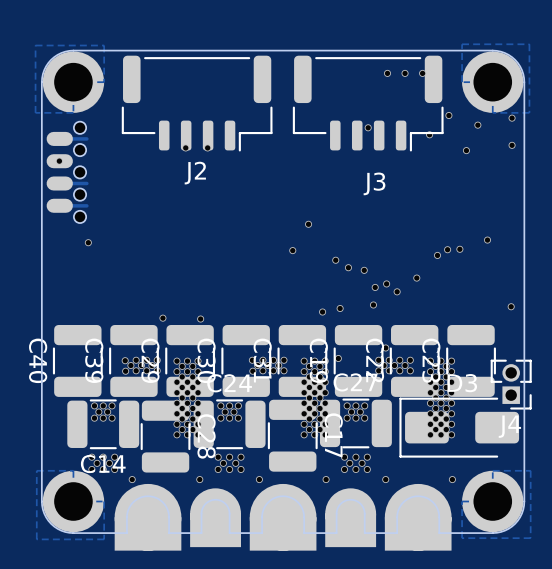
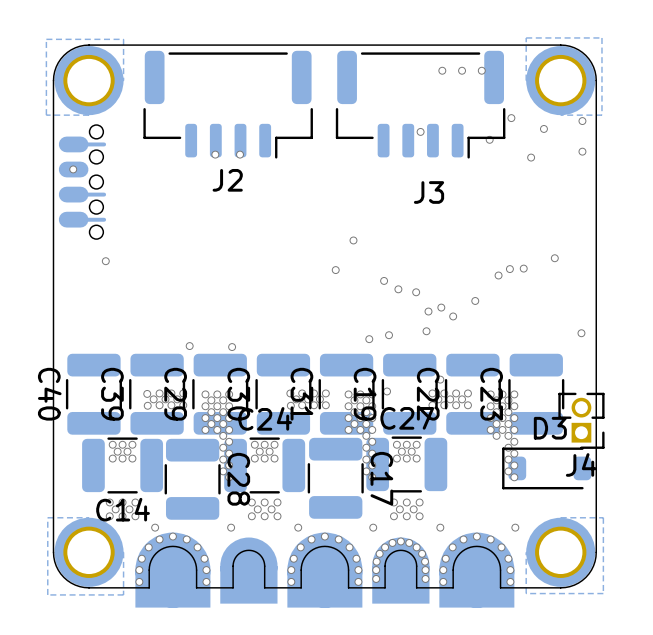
via: (182, 397) -> none
via: (309, 397) -> none
D3 footprint: [399, 397, 520, 458] -> [502, 447, 592, 490]
via: (176, 403) -> none
via: (187, 403) -> none
via: (304, 403) -> none
via: (314, 403) -> none
via: (430, 403) -> none
via: (441, 403) -> none
via: (182, 408) -> none
via: (309, 408) -> none
via: (435, 408) -> none
via: (176, 413) -> none
via: (187, 413) -> none
via: (304, 413) -> none
via: (314, 413) -> none
via: (430, 413) -> none
via: (441, 413) -> none
via: (182, 419) -> none
via: (309, 419) -> none
via: (435, 419) -> none
via: (176, 424) -> none
via: (187, 424) -> none
via: (304, 424) -> none
via: (314, 424) -> none
via: (430, 424) -> none
via: (441, 424) -> none
via: (182, 429) -> none
via: (309, 429) -> none
via: (435, 429) -> none
via: (176, 434) -> none
via: (187, 434) -> none
via: (304, 434) -> none
via: (314, 434) -> none
via: (430, 434) -> none
via: (441, 434) -> none
via: none -> (172, 536)
via: none -> (324, 536)
via: none -> (476, 536)
via: none -> (159, 539)
via: none -> (186, 539)
via: none -> (311, 539)
via: none -> (338, 539)
via: none -> (463, 539)
via: none -> (490, 539)
via: none -> (400, 541)
via: none -> (392, 542)
via: none -> (409, 542)
via: none -> (148, 547)
via: none -> (197, 547)
via: none -> (300, 547)
via: none -> (349, 547)
via: none -> (385, 547)
via: none -> (416, 547)
via: none -> (452, 547)
via: none -> (501, 547)
via: none -> (379, 553)
via: none -> (422, 553)
via: none -> (141, 558)
via: none -> (204, 558)
via: none -> (293, 558)
via: none -> (356, 558)
via: none -> (445, 558)
via: none -> (508, 558)
via: none -> (376, 561)
via: none -> (425, 561)
via: none -> (139, 570)
via: none -> (206, 570)
via: none -> (291, 570)
via: none -> (358, 570)
via: none -> (376, 570)
via: none -> (425, 570)
via: none -> (443, 570)
via: none -> (510, 570)
via: none -> (376, 578)
via: none -> (425, 578)
via: none -> (139, 581)
via: none -> (206, 581)
via: none -> (291, 581)
via: none -> (358, 581)
via: none -> (443, 581)
via: none -> (510, 581)

